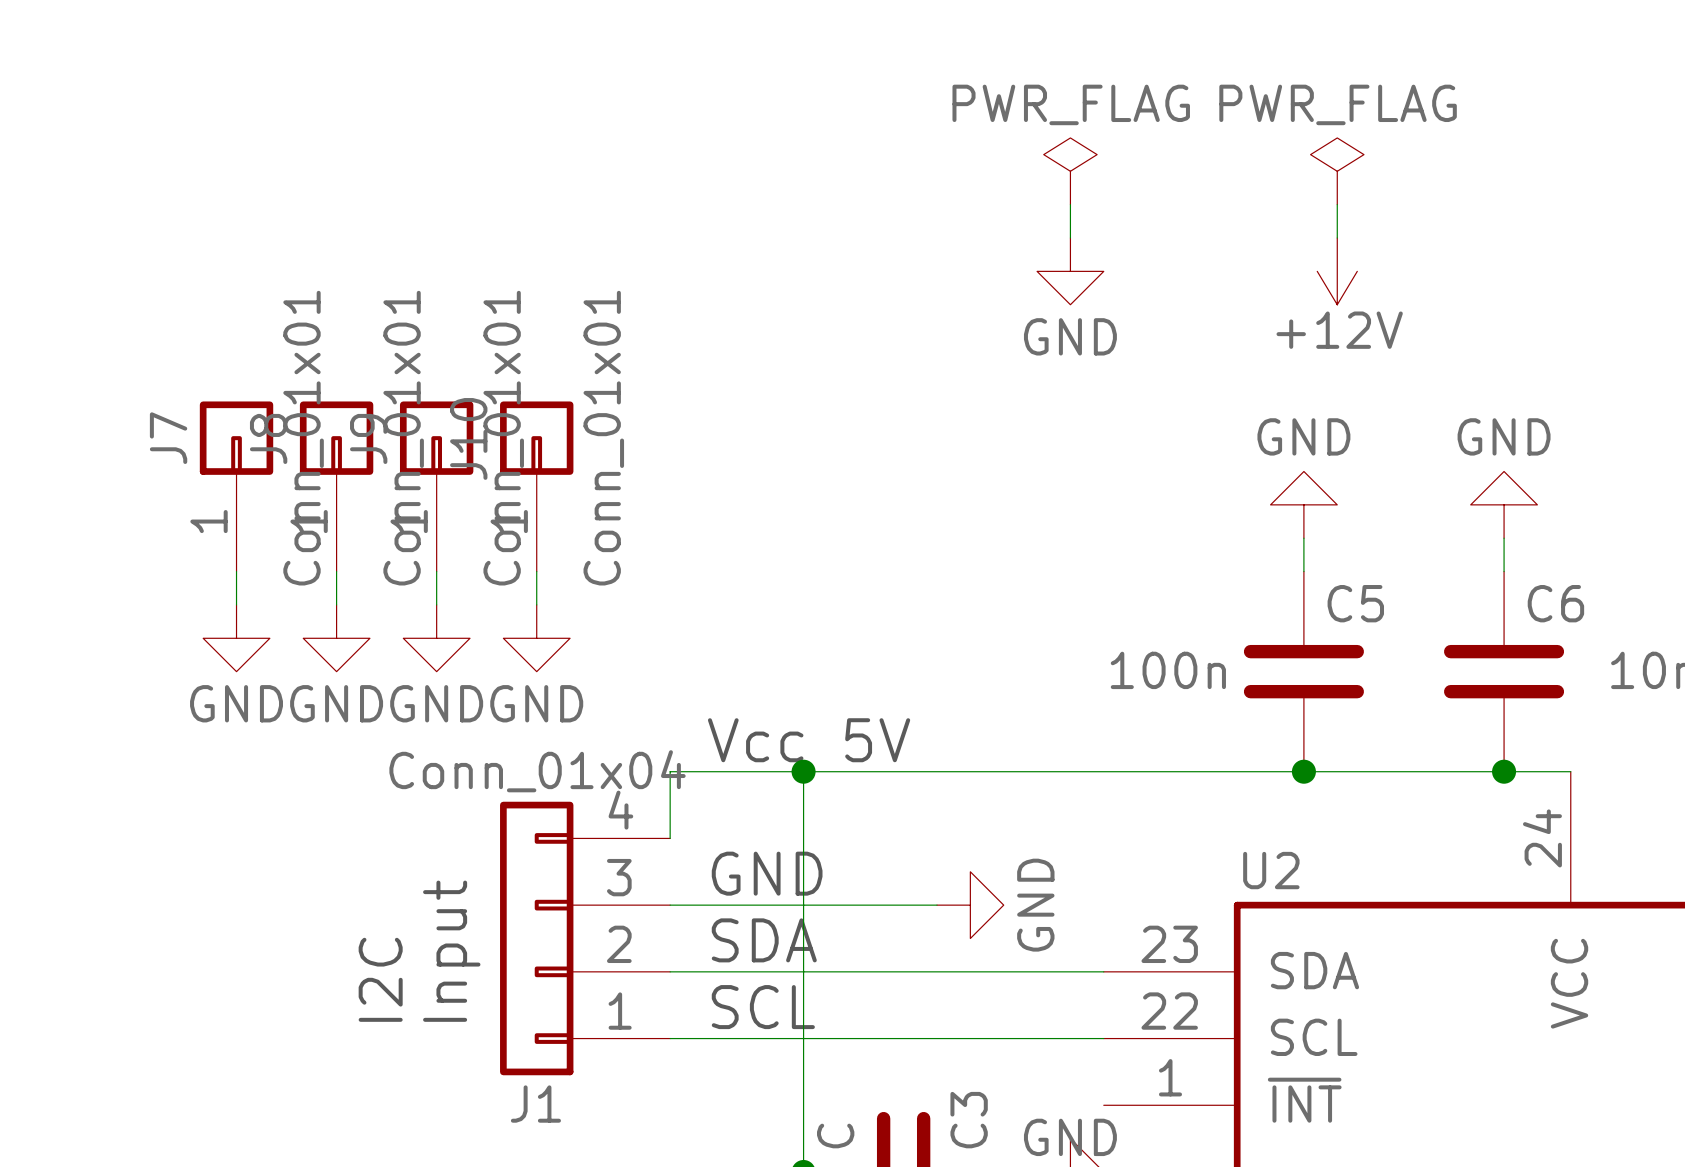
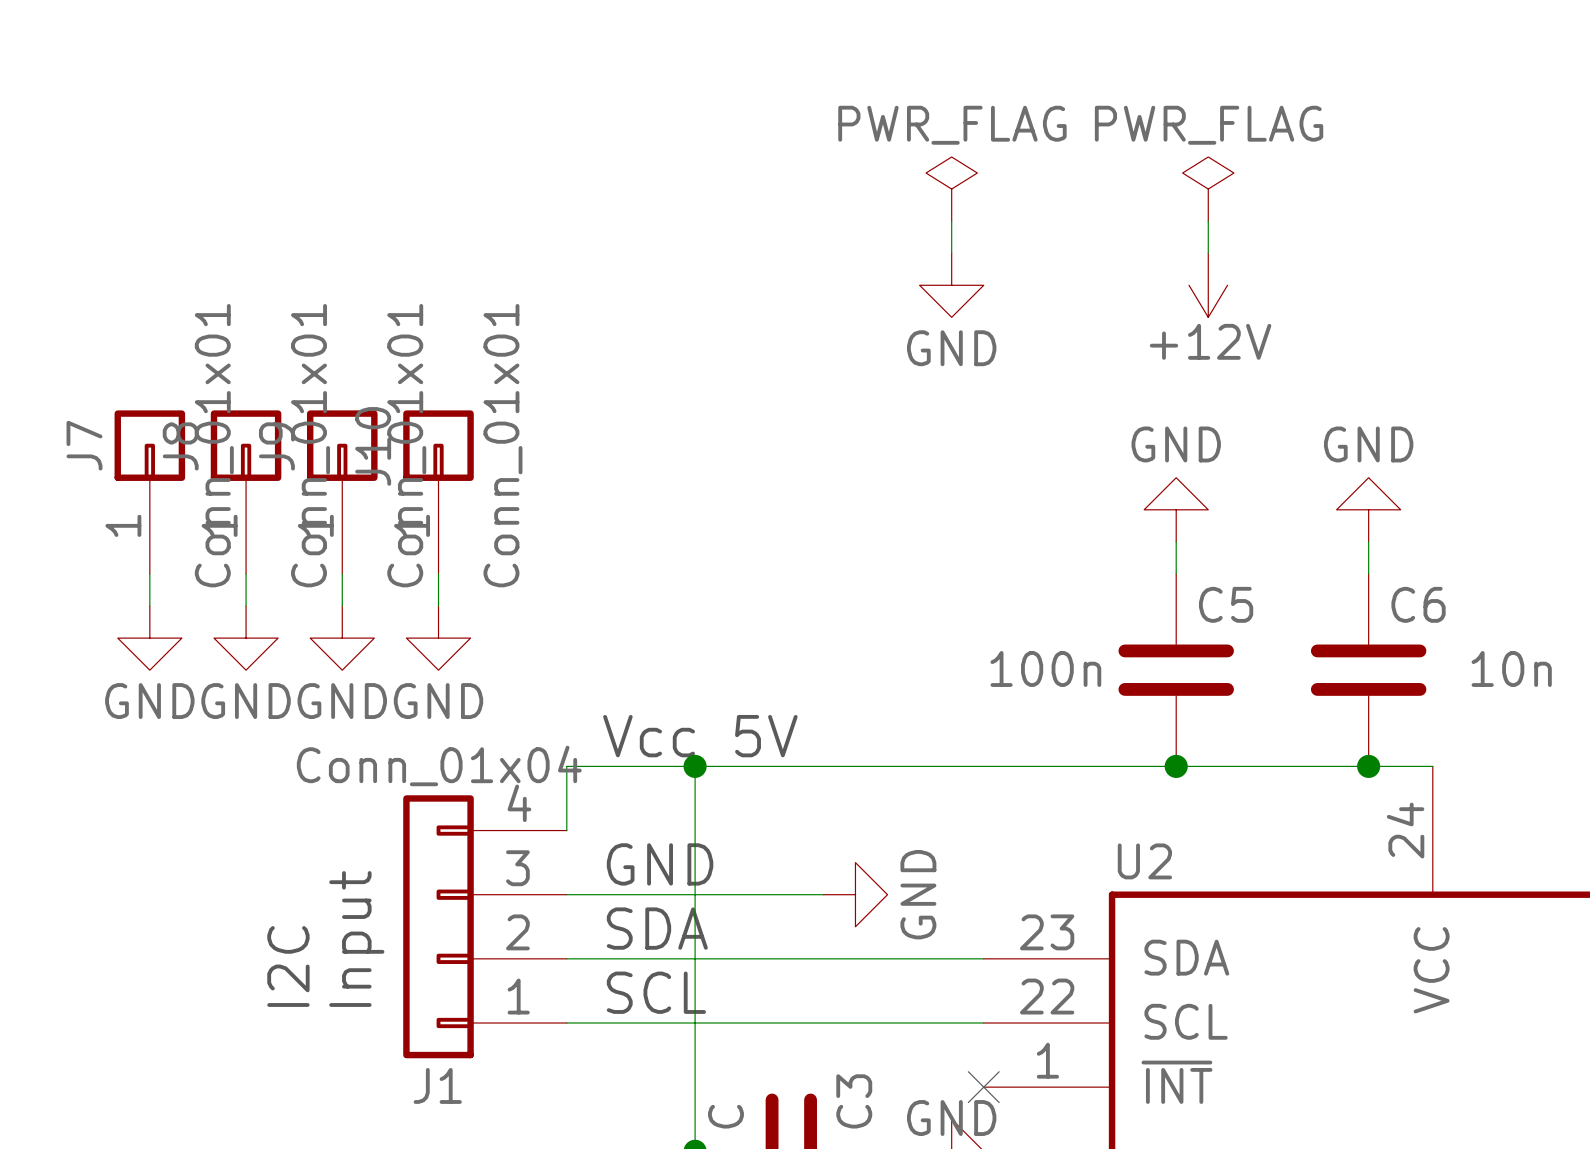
no-connect mark: none -> (983, 1087)

